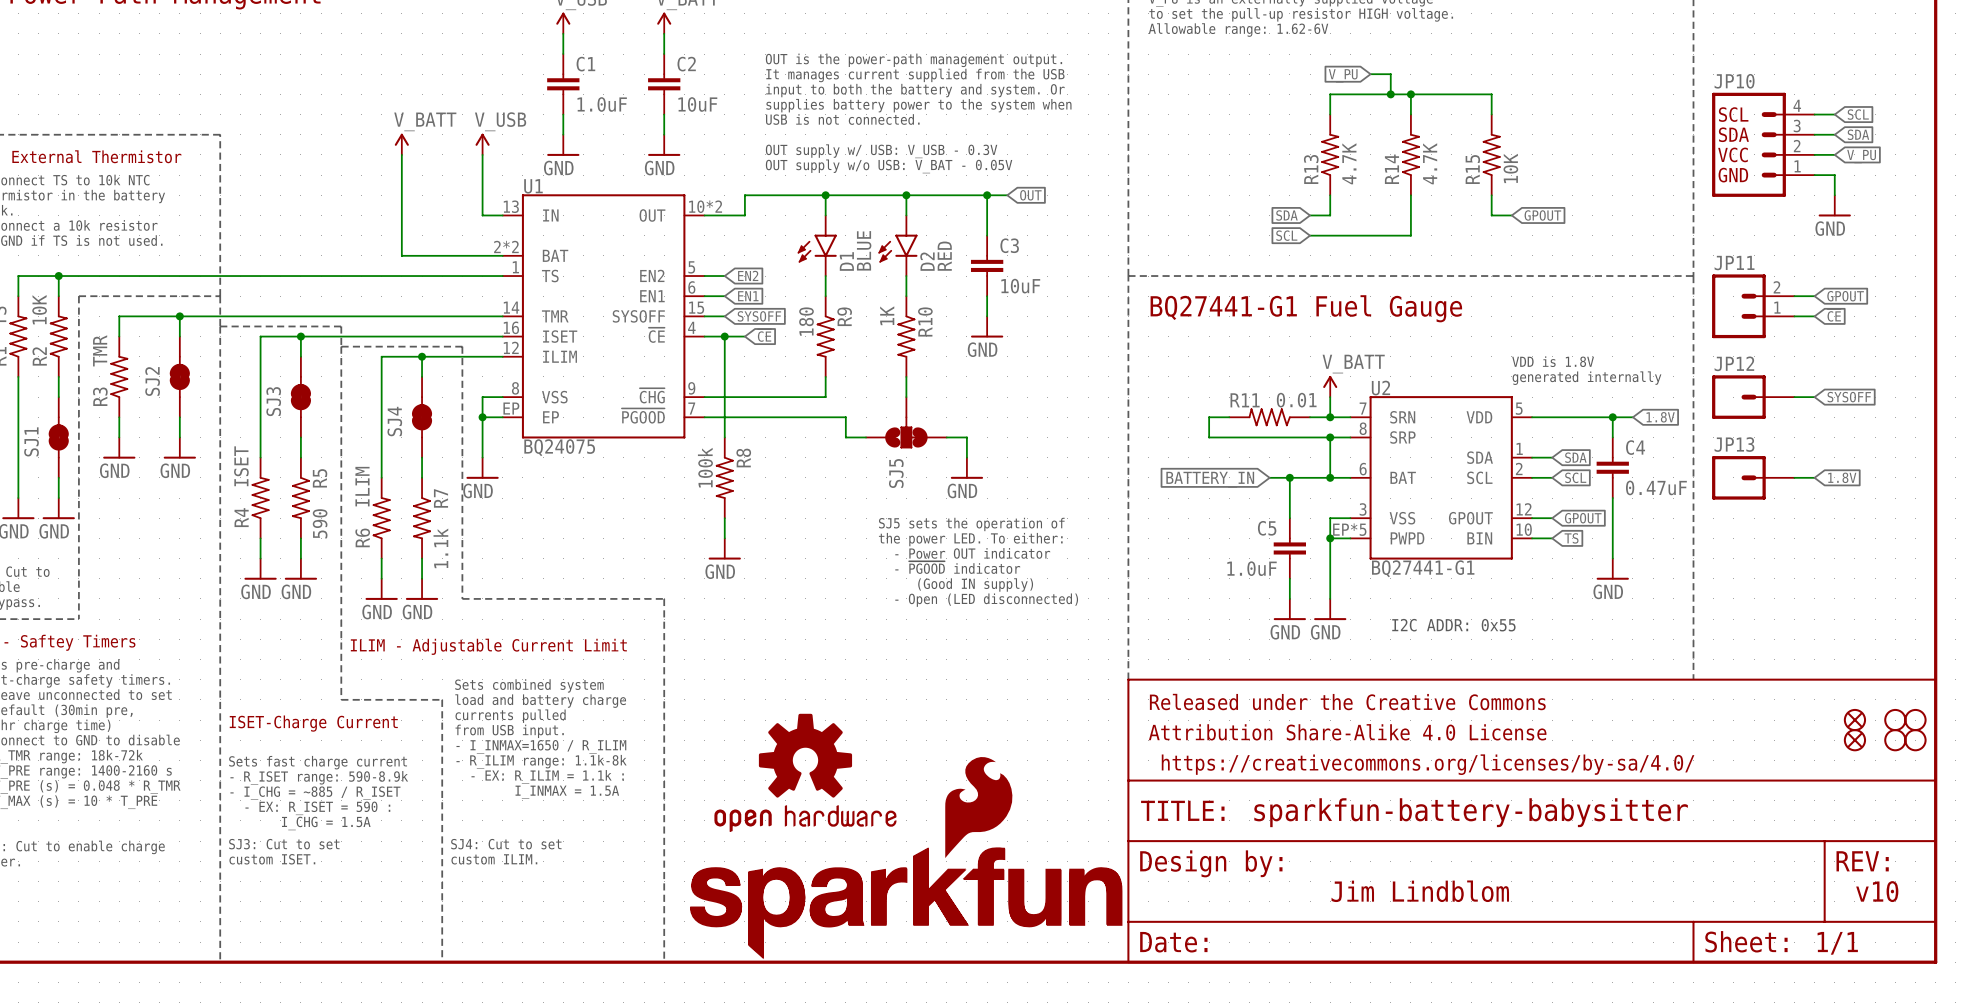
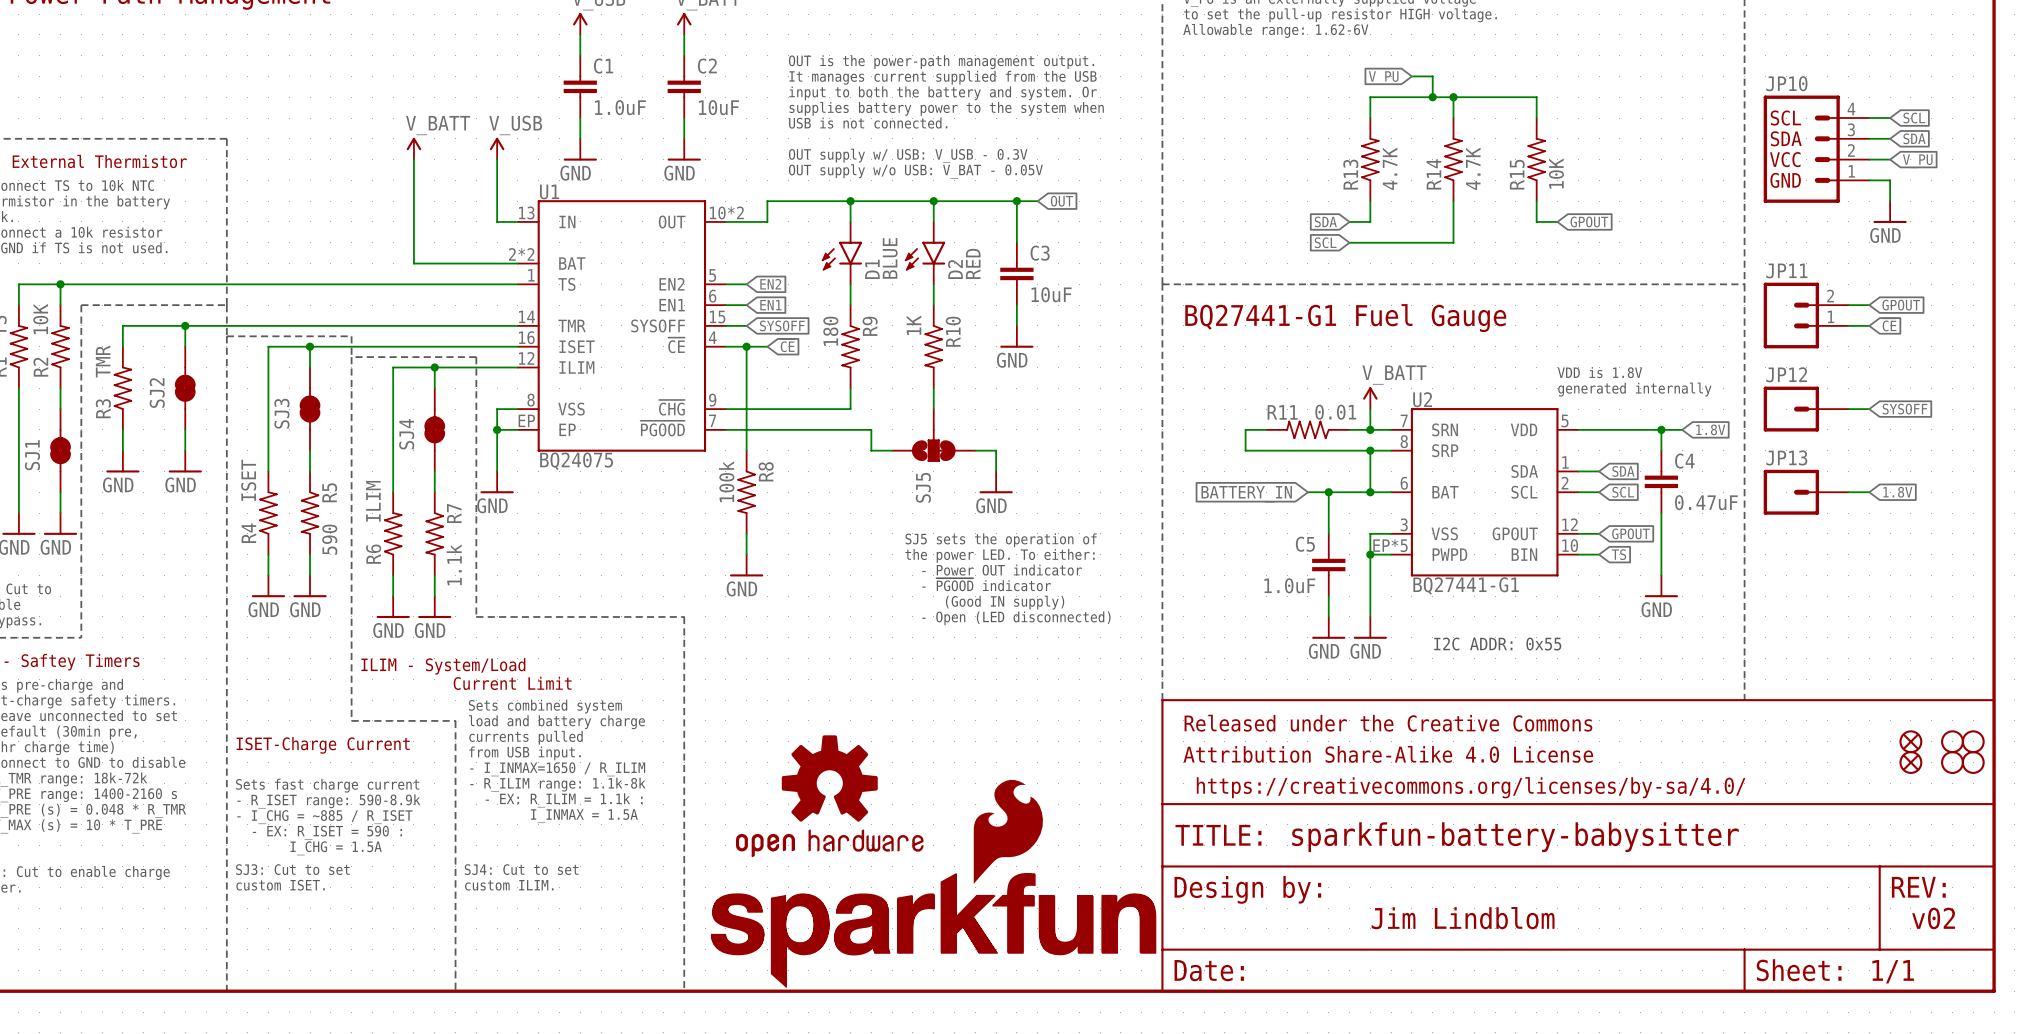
text: ILIM - Adjustable Current Limit (488, 646) -> ILIM - System/Load (443, 666)
text: none -> Current Limit (512, 683)
text: v10 (1877, 891) -> v02 (1933, 918)

